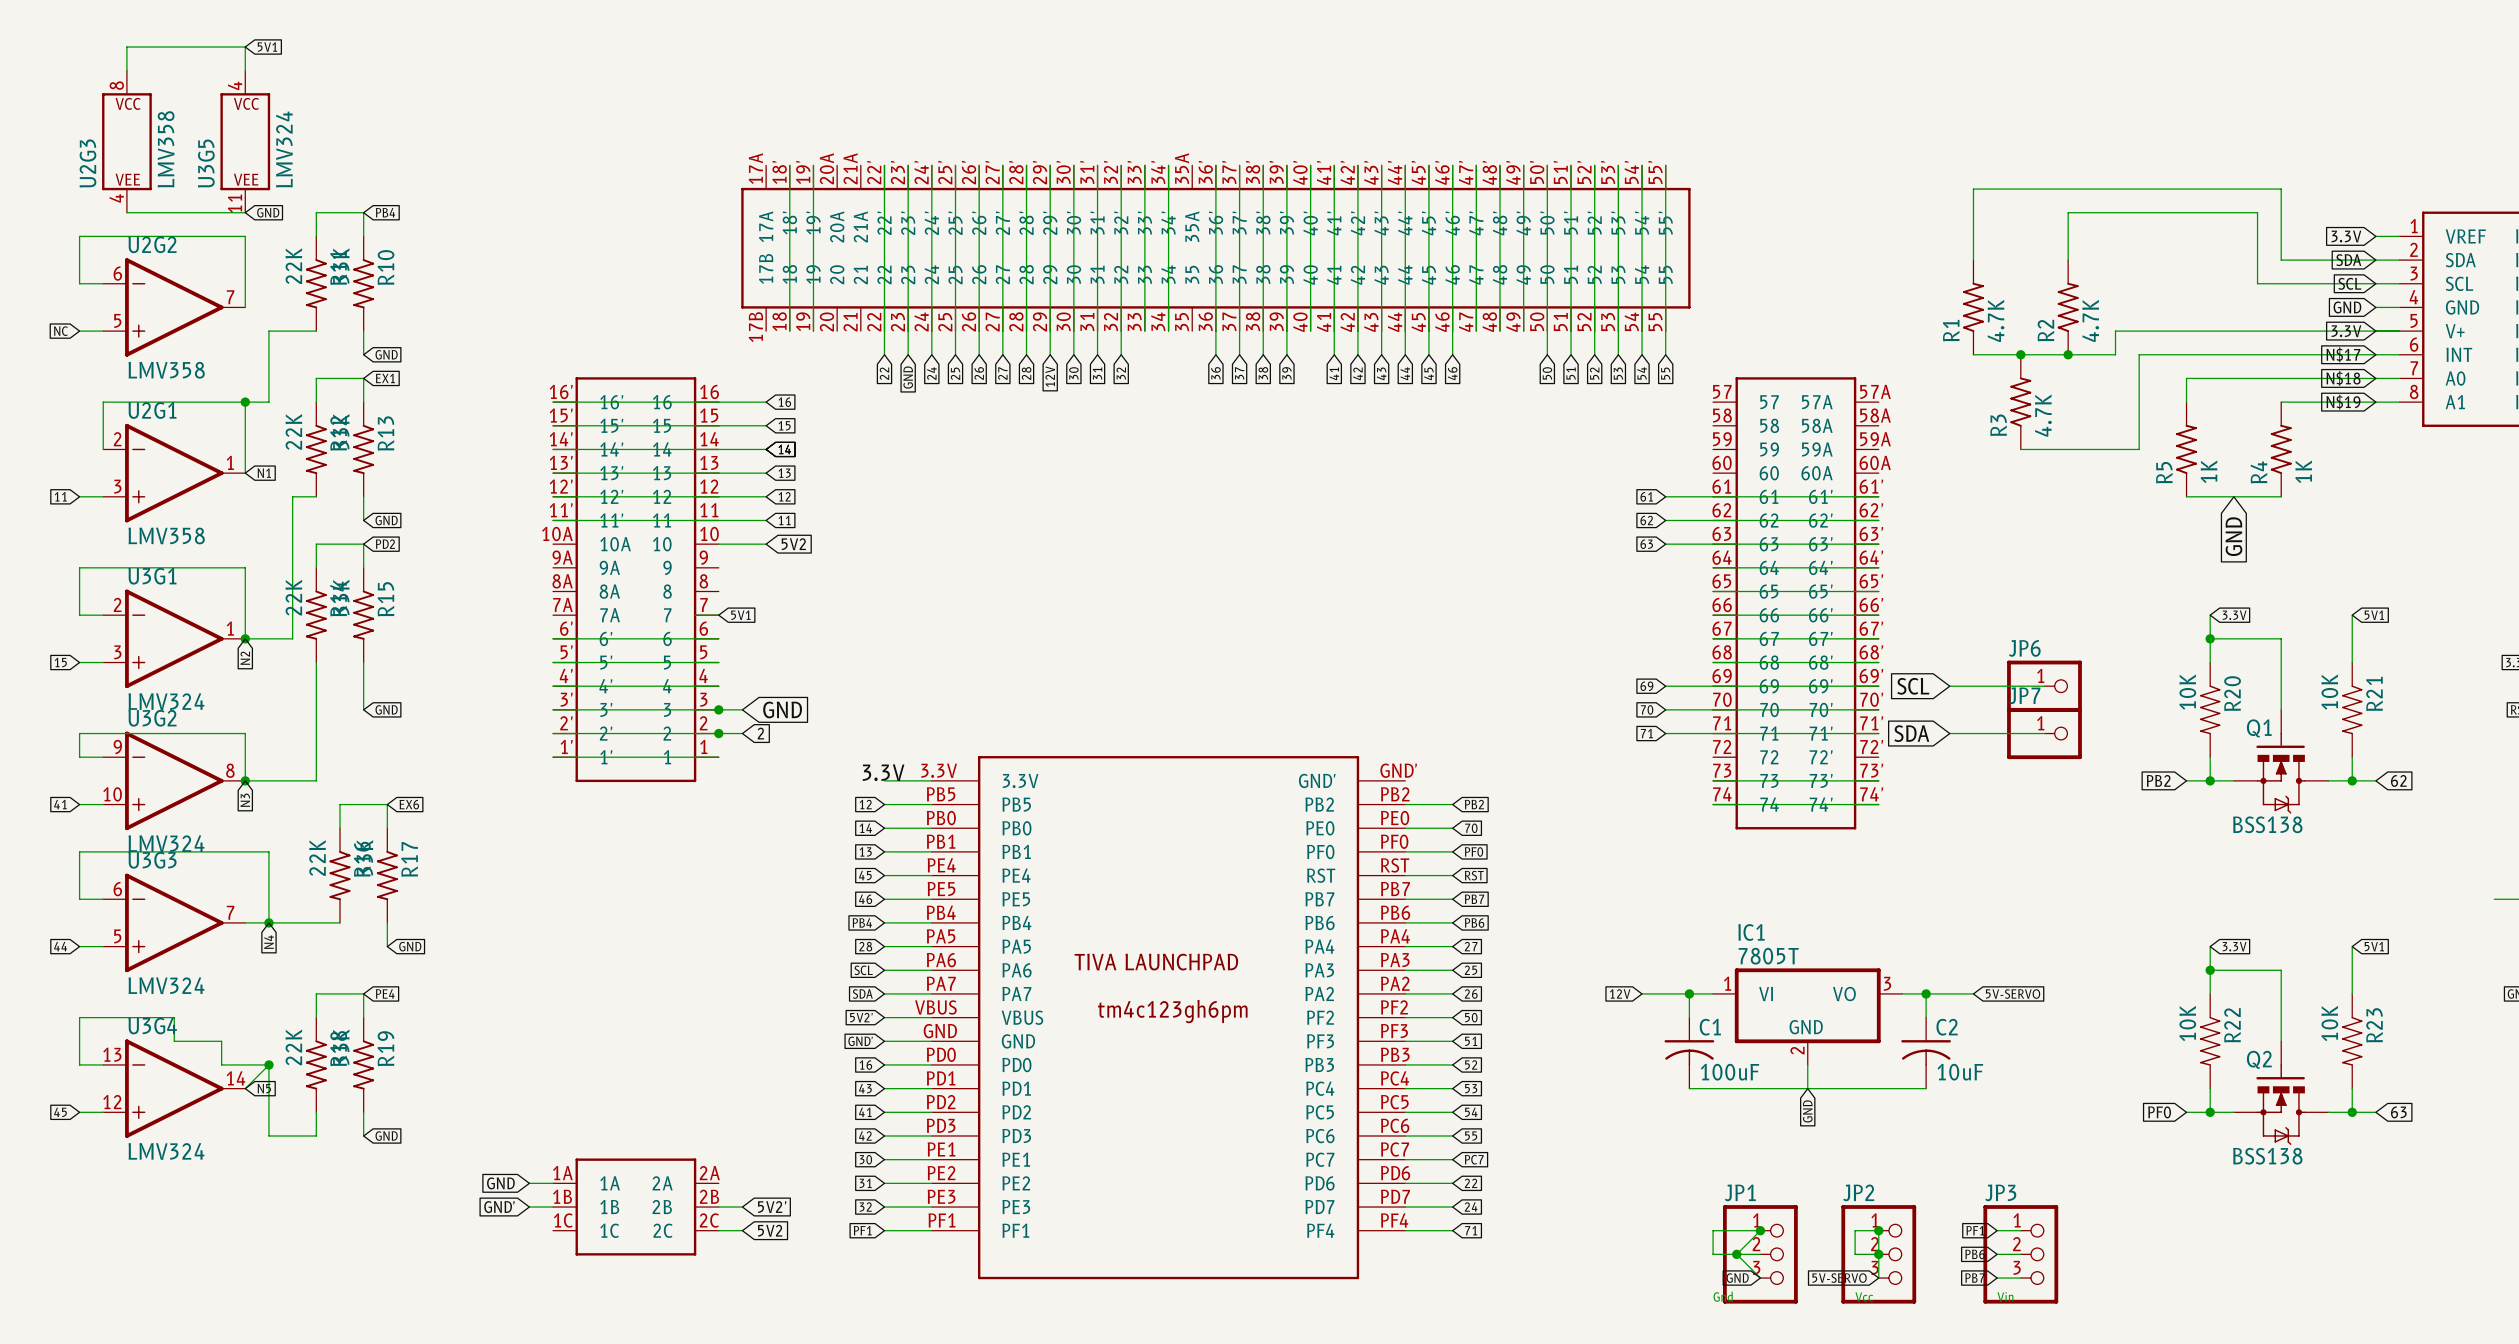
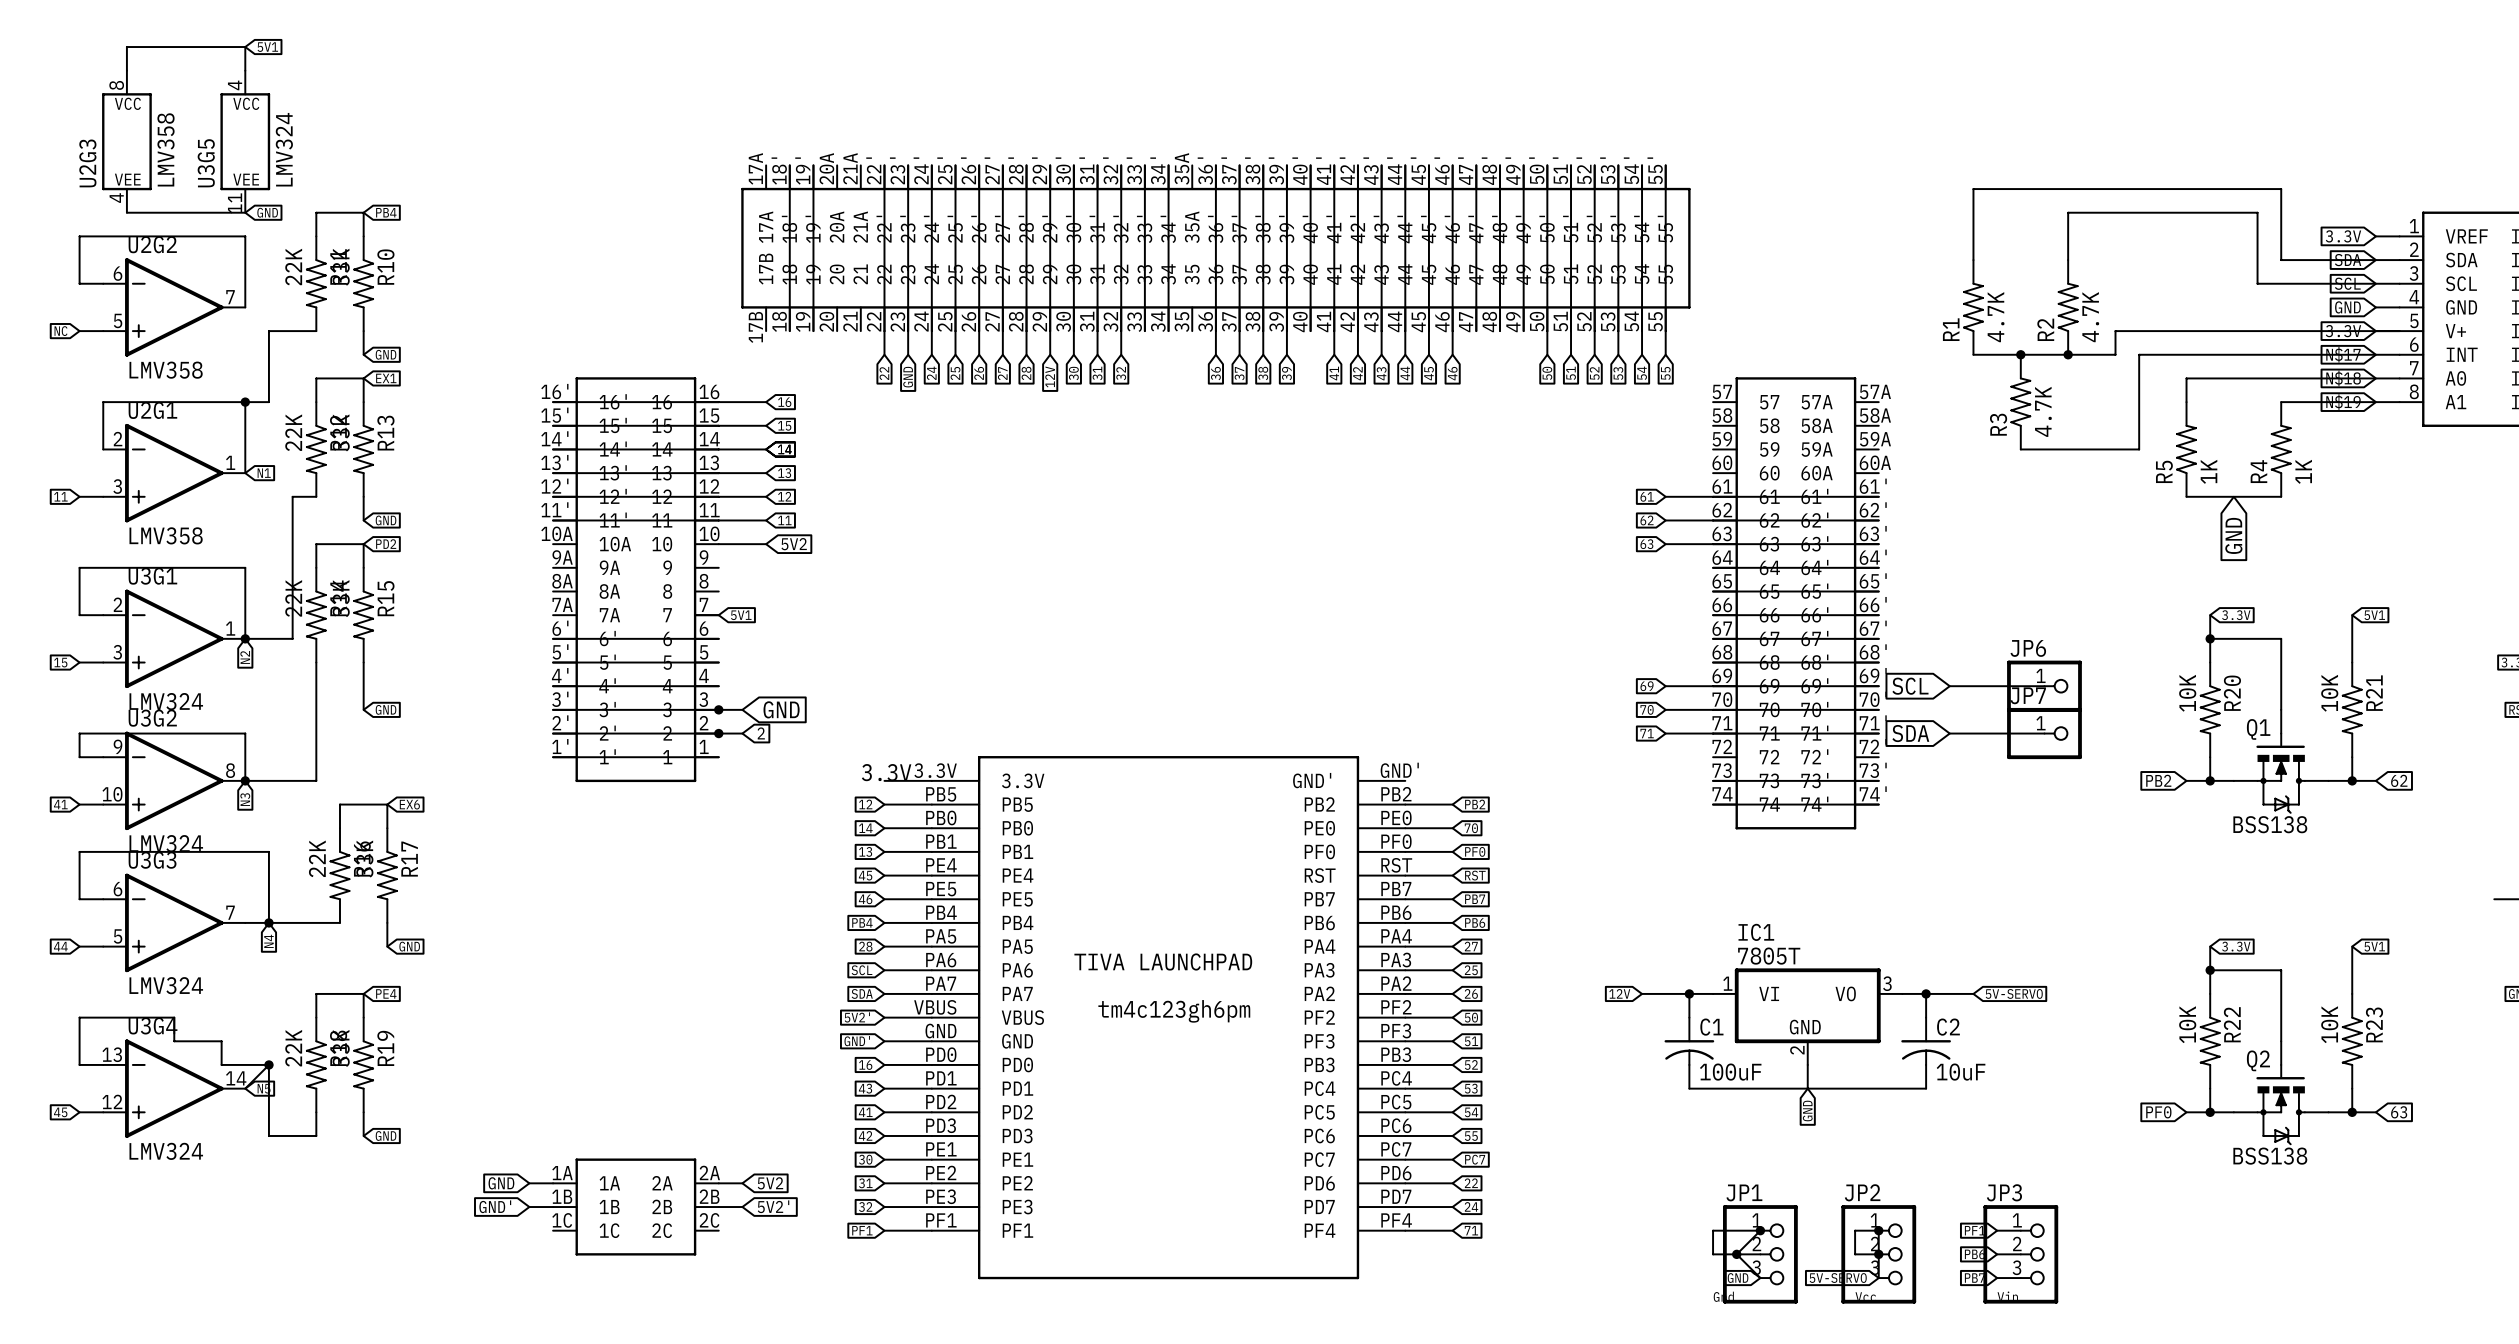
wire: (718, 1230) (742, 1230) -> (718, 1183) (742, 1183)
global label position: 5V2 (770, 1230) -> 5V2 (770, 1183)

